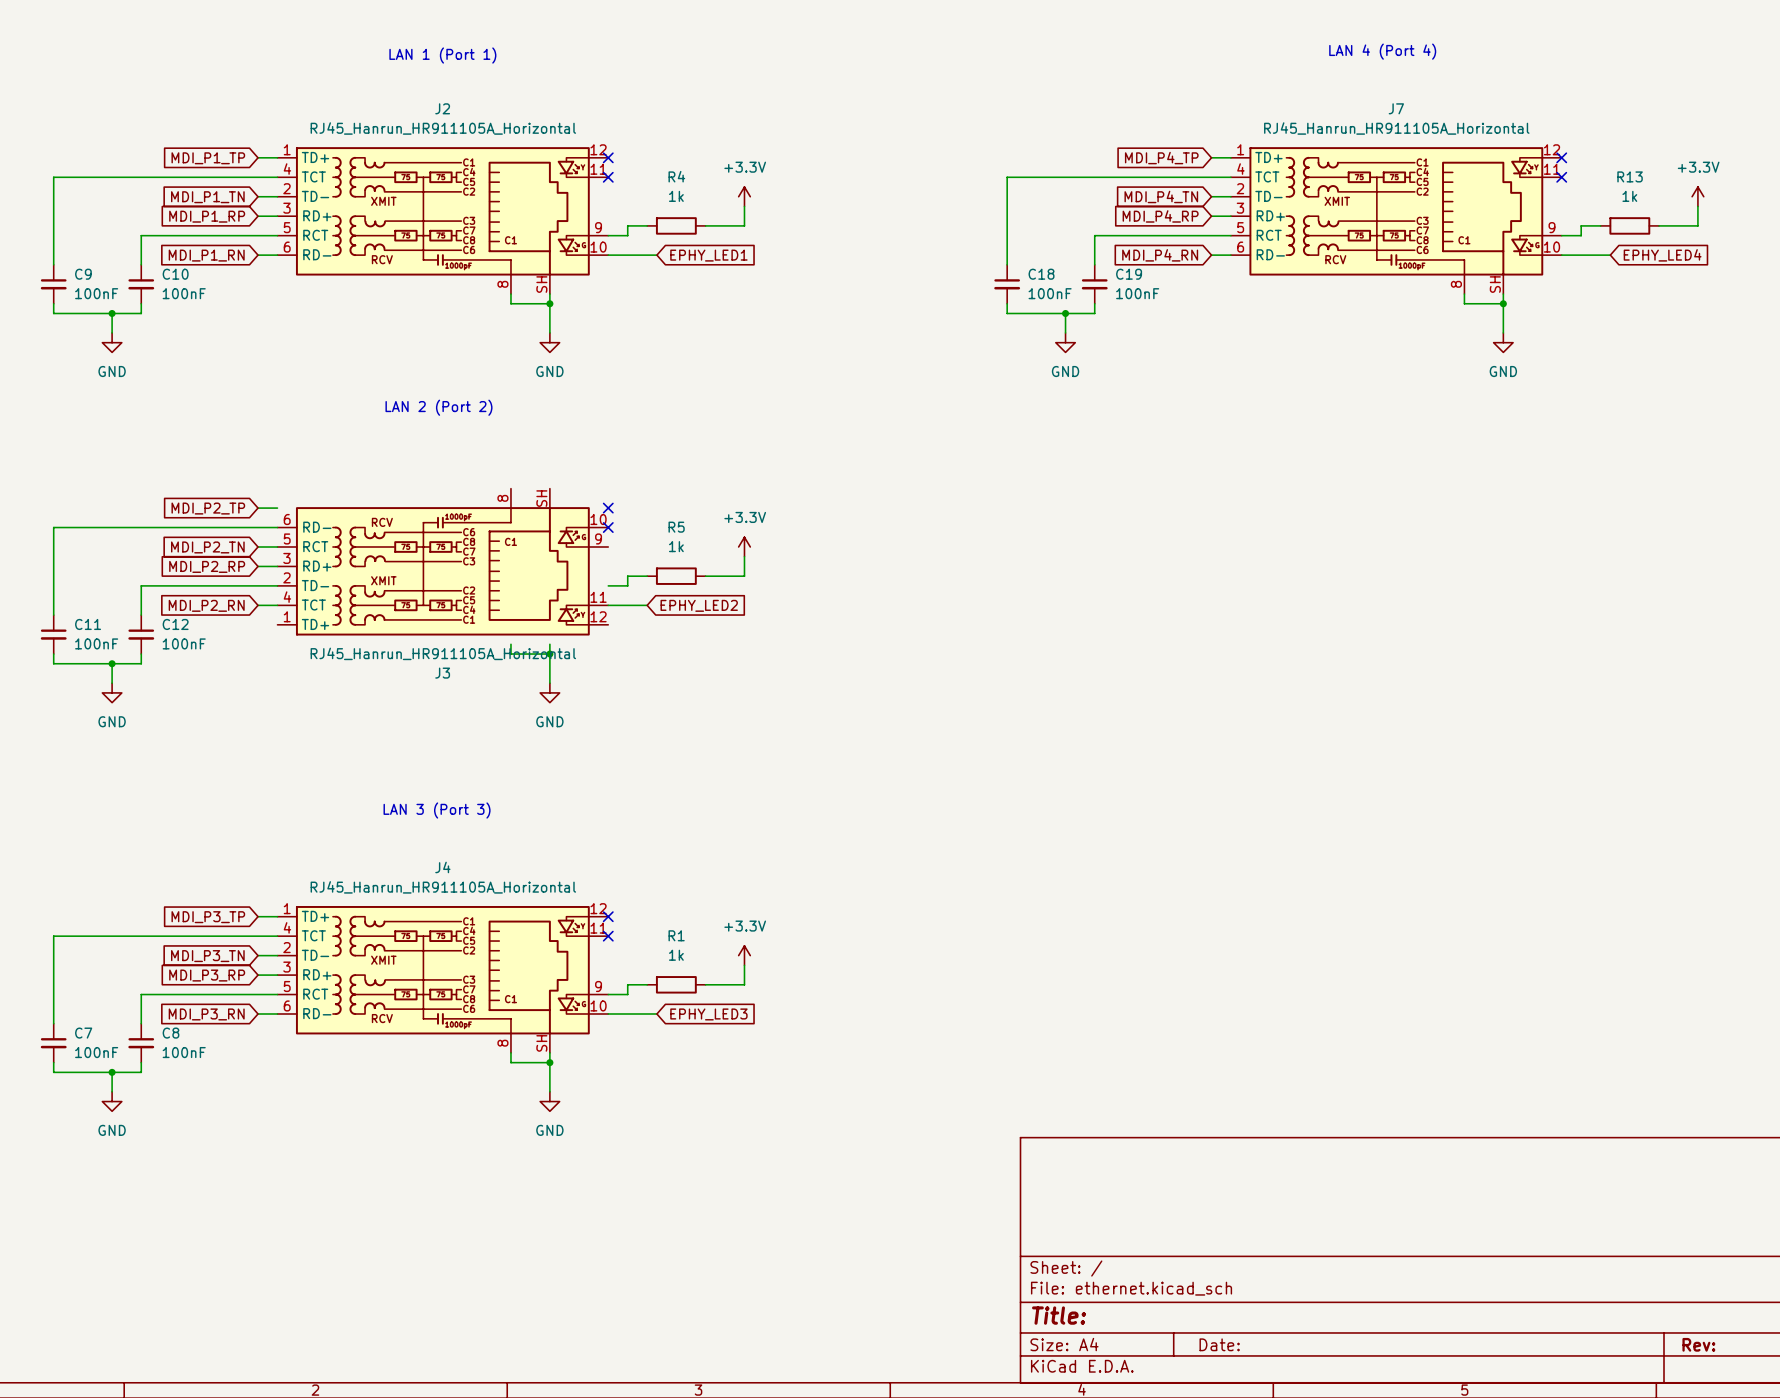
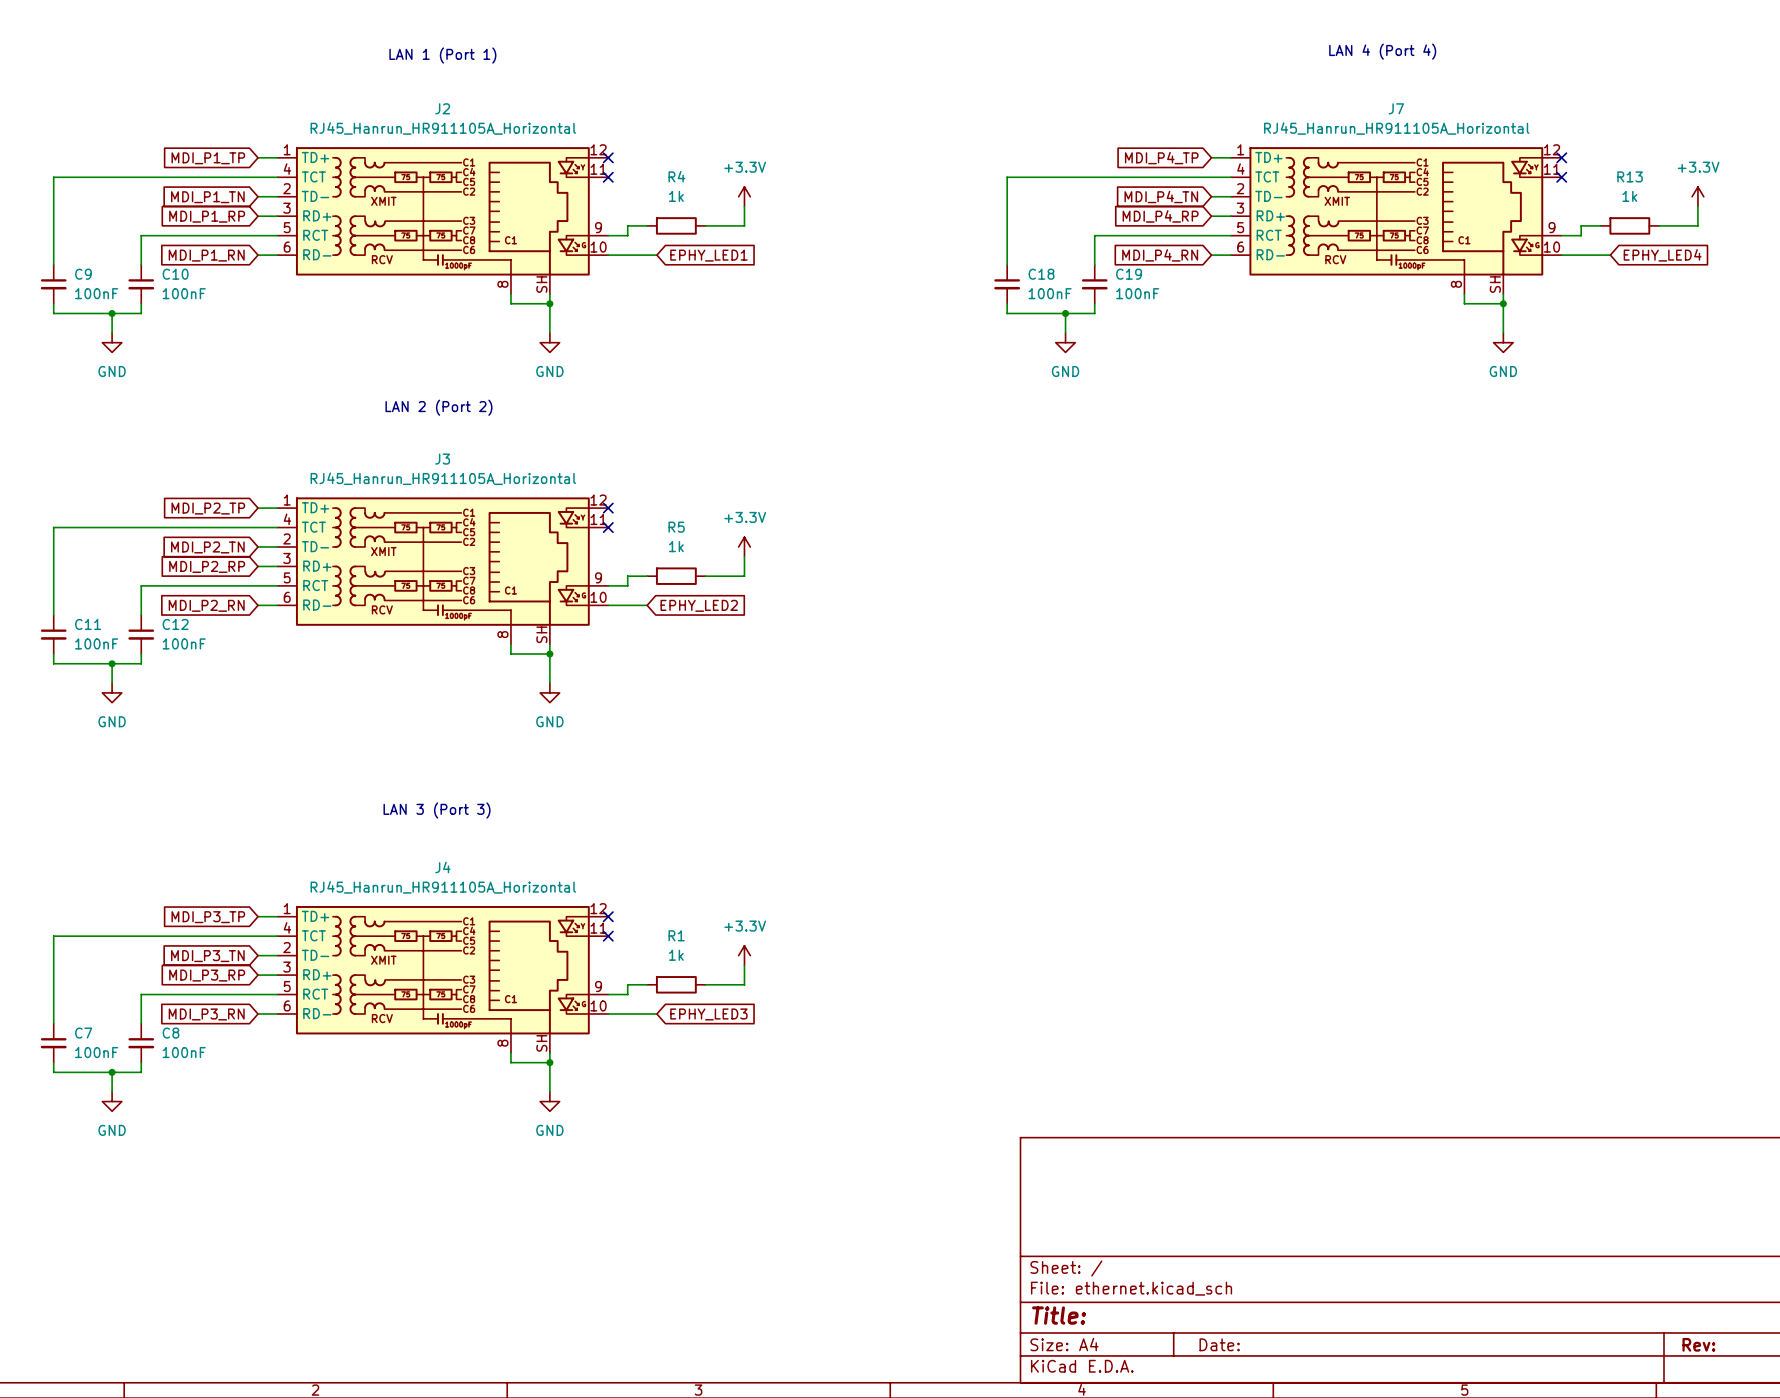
J3 flip: as is (442, 571) -> up-down (442, 561)

